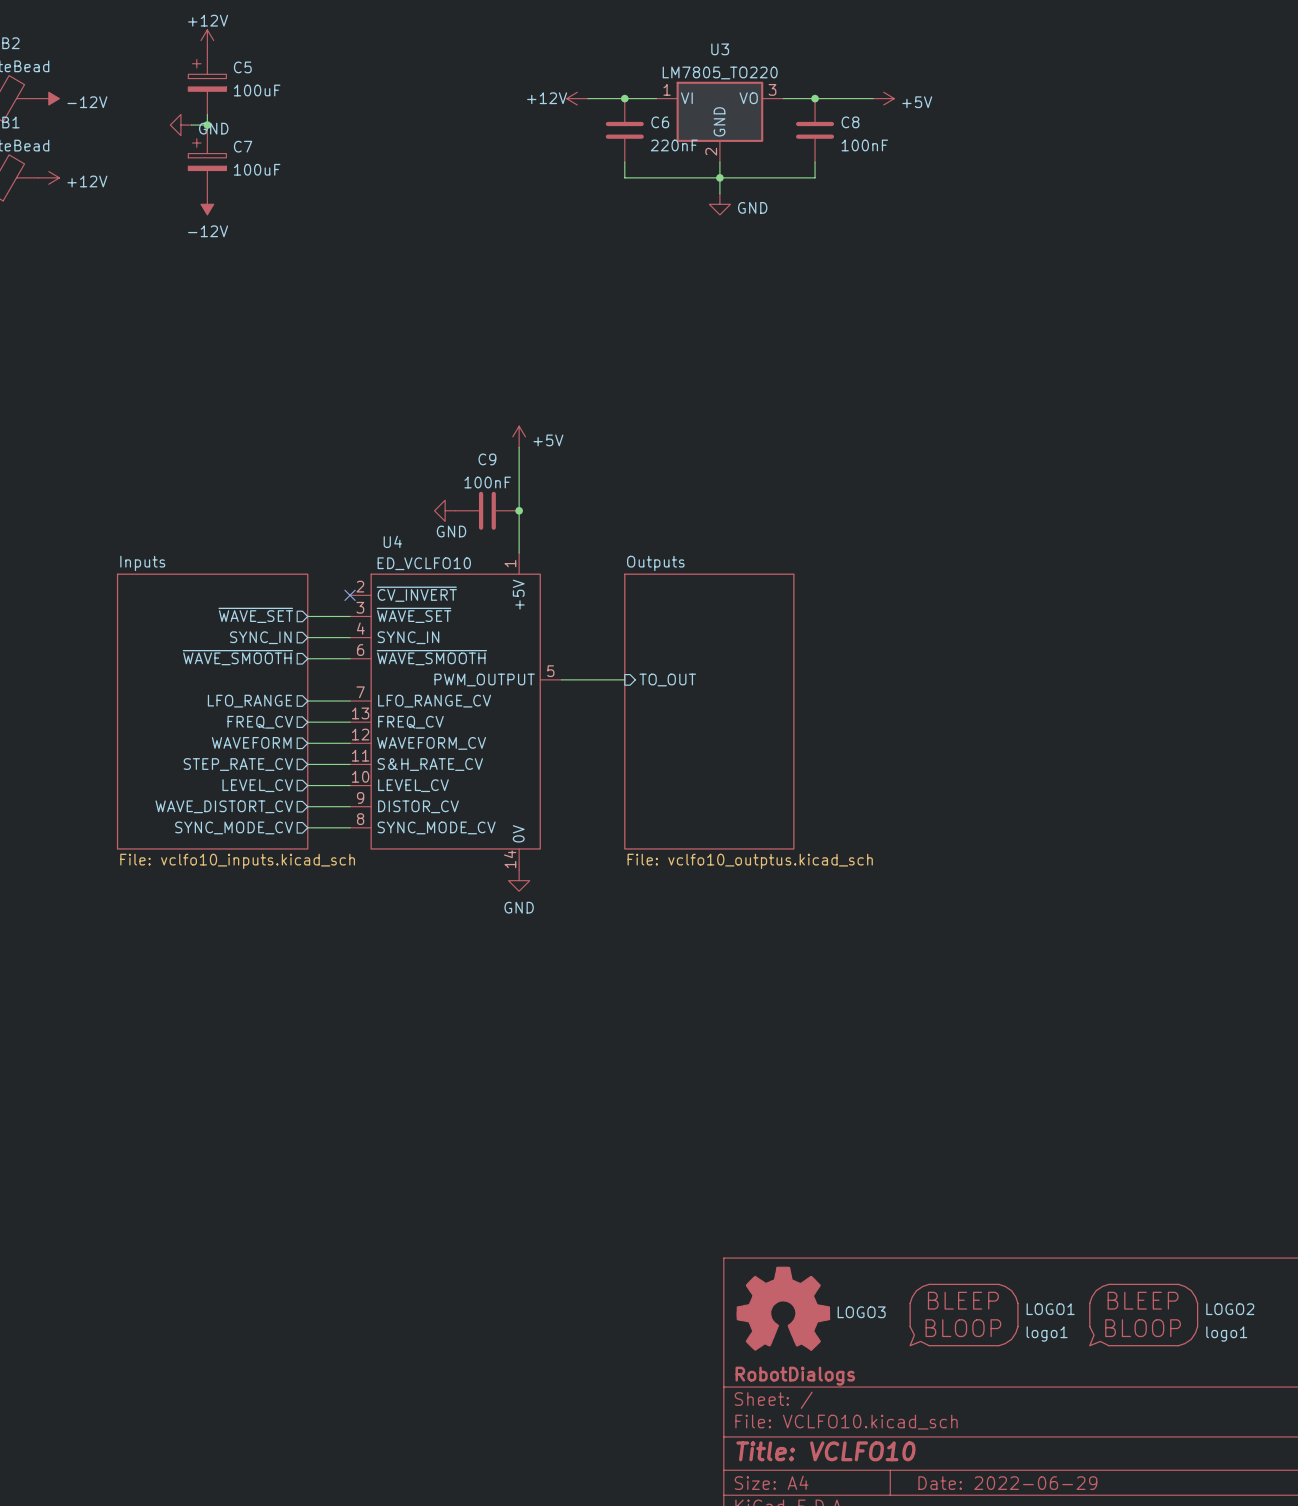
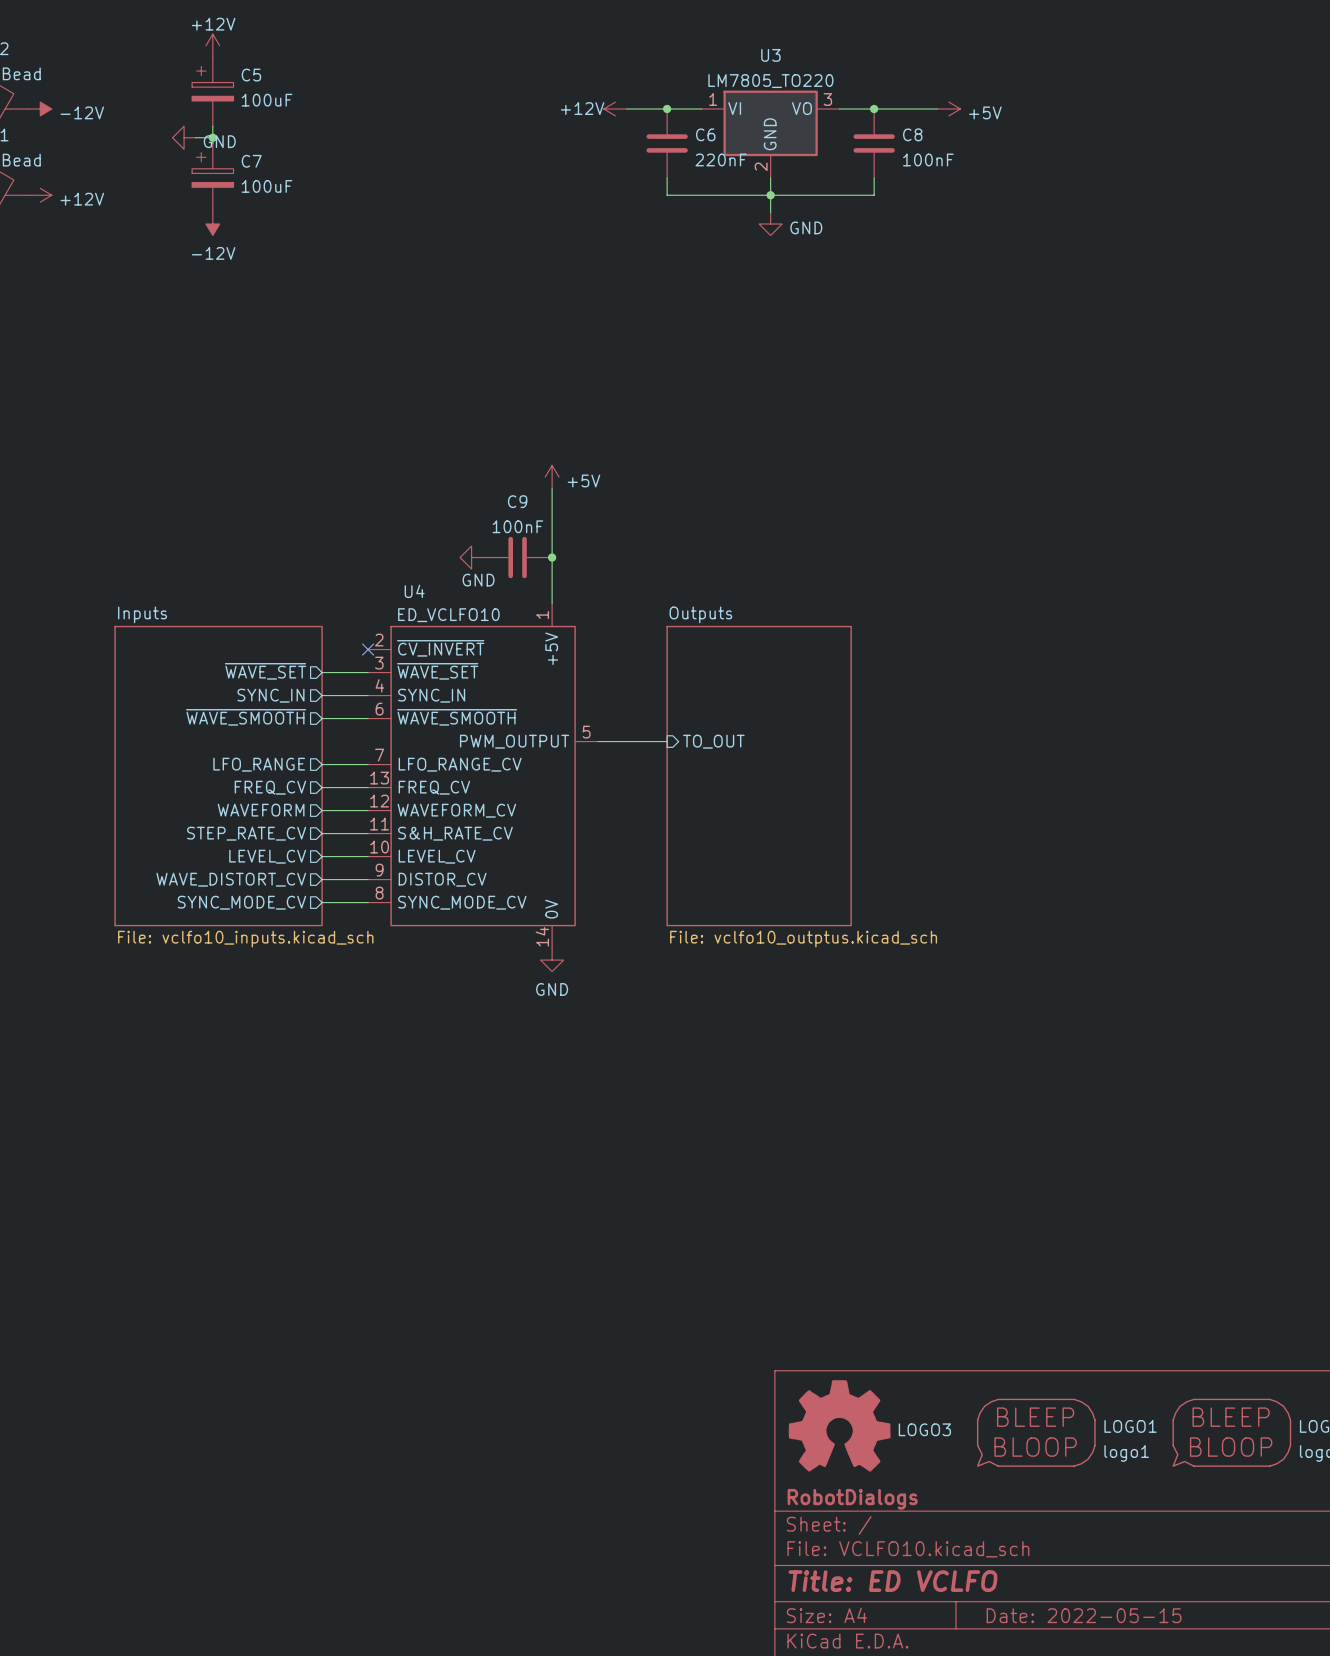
title block: Title: VCLFO10 (825, 1451) -> Title: ED VCLFO (893, 1581)
title block: Date: 2022-06-29 (1007, 1483) -> Date: 2022-05-15 (1084, 1615)

